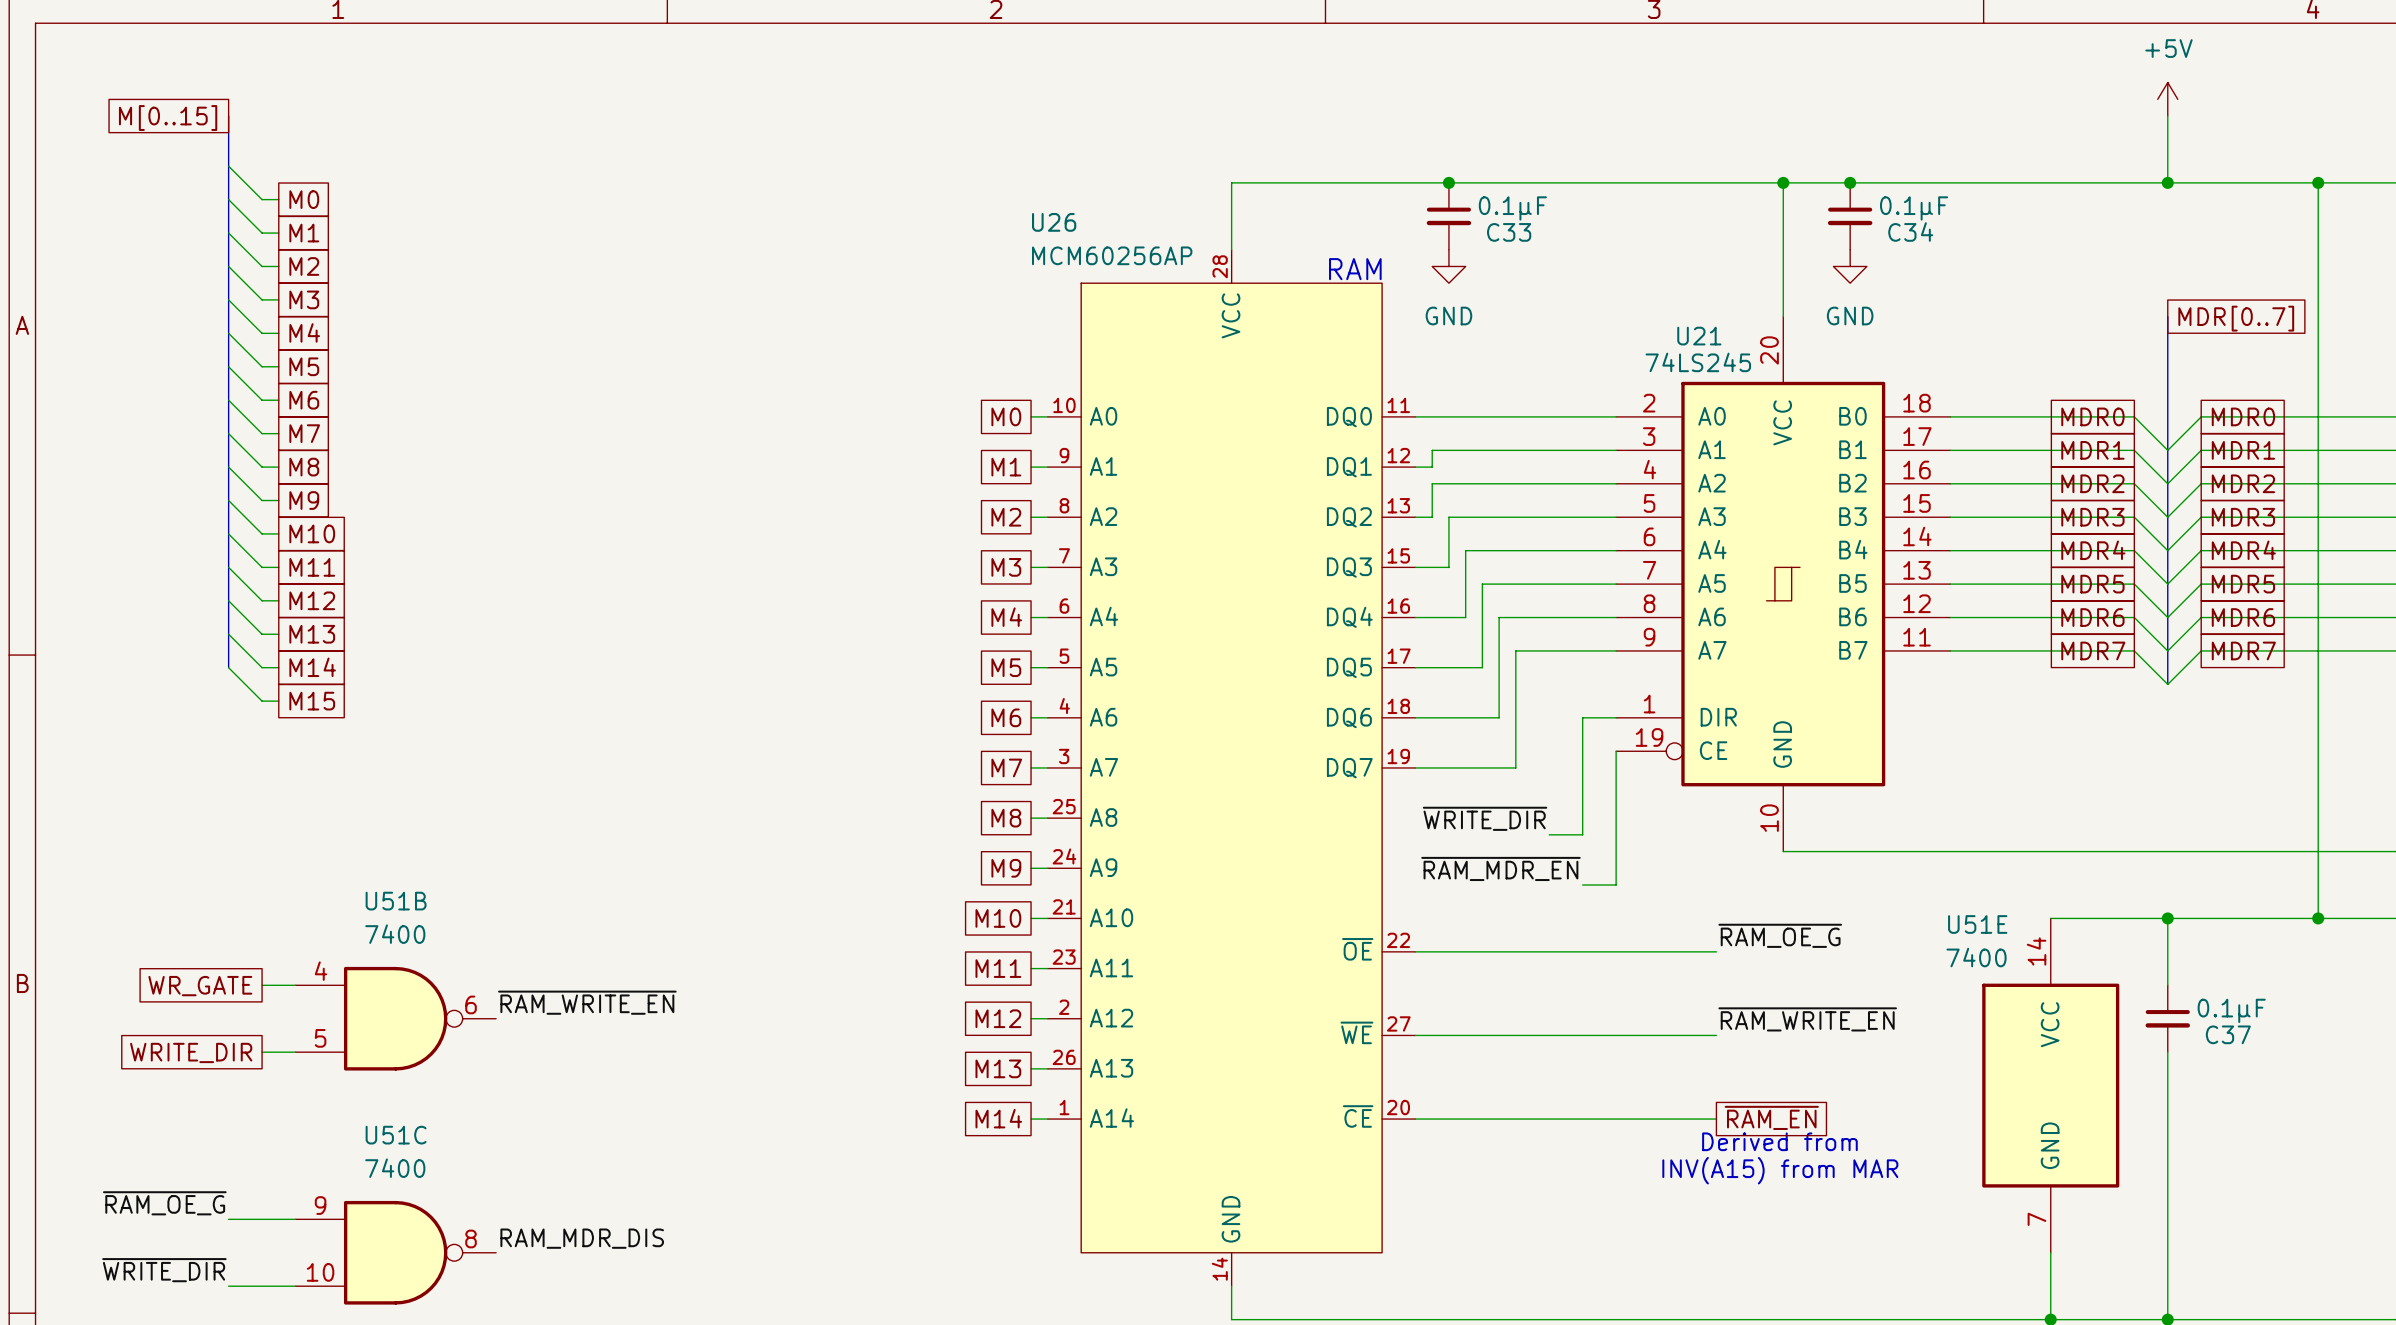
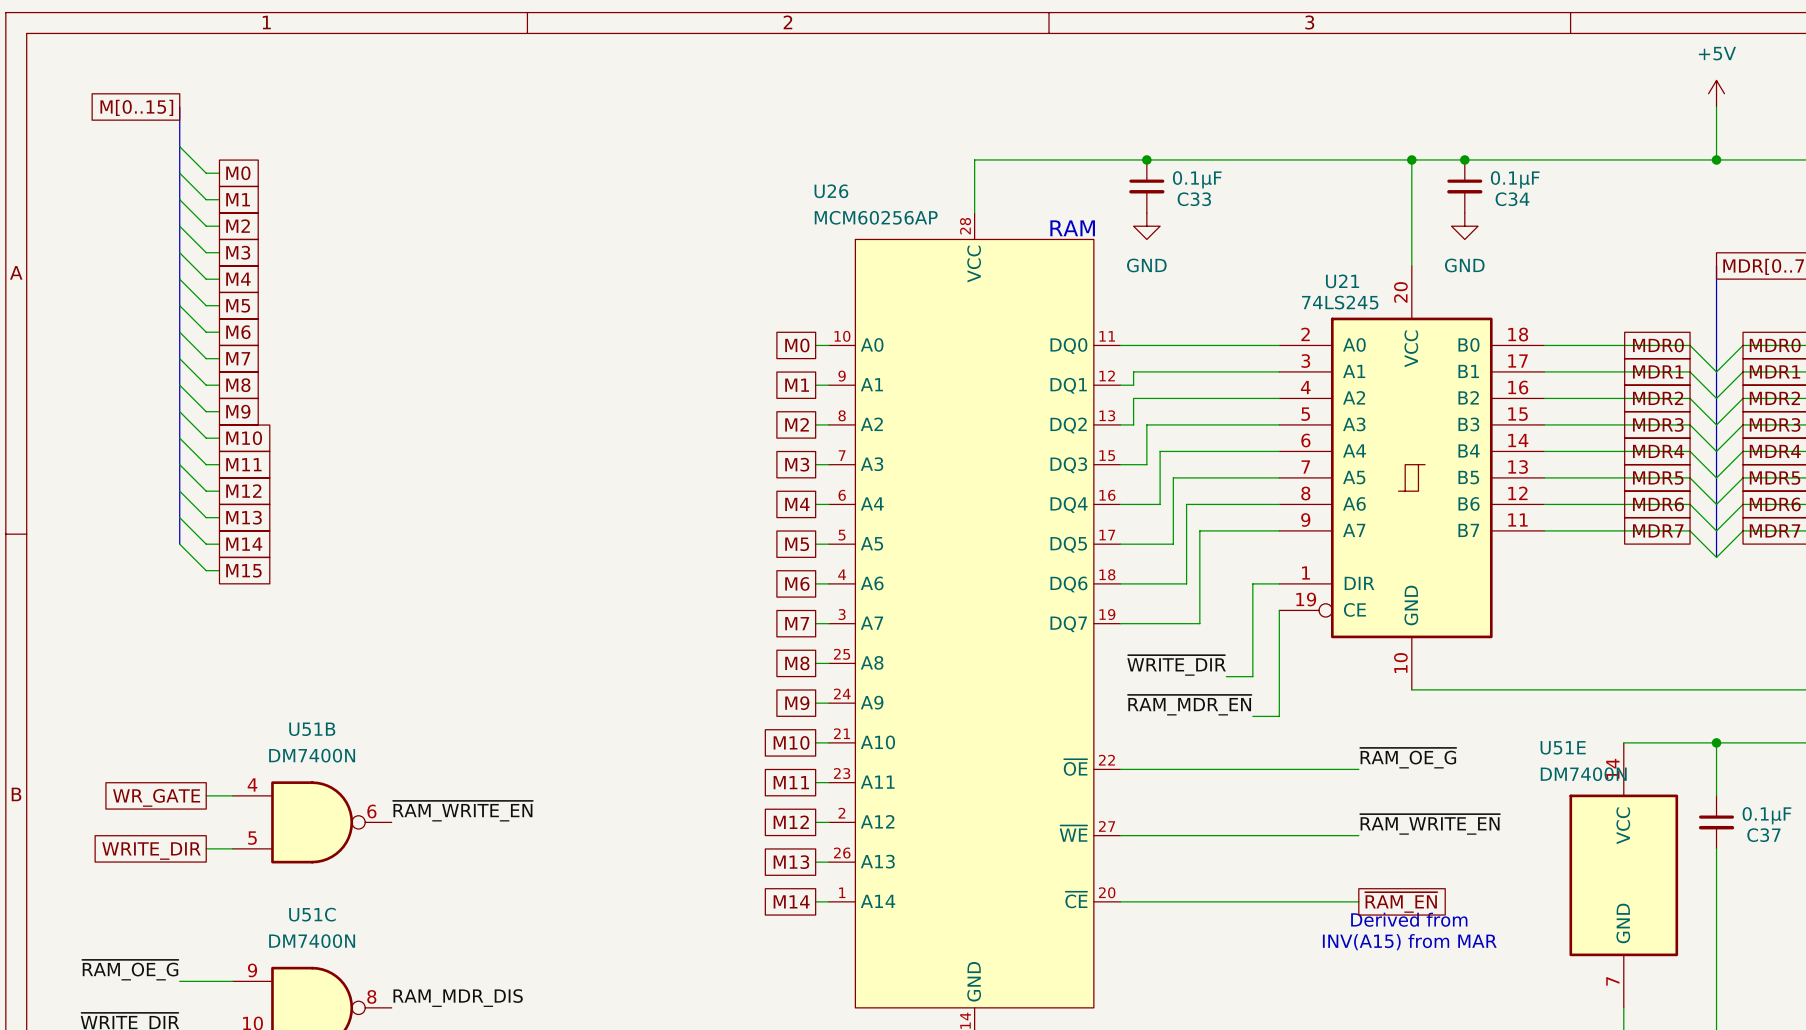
U51B value: 7400 (395, 934) -> DM7400N (312, 755)
U51E value: 7400 (1976, 957) -> DM7400N (1583, 774)
U51C value: 7400 (395, 1168) -> DM7400N (312, 941)

